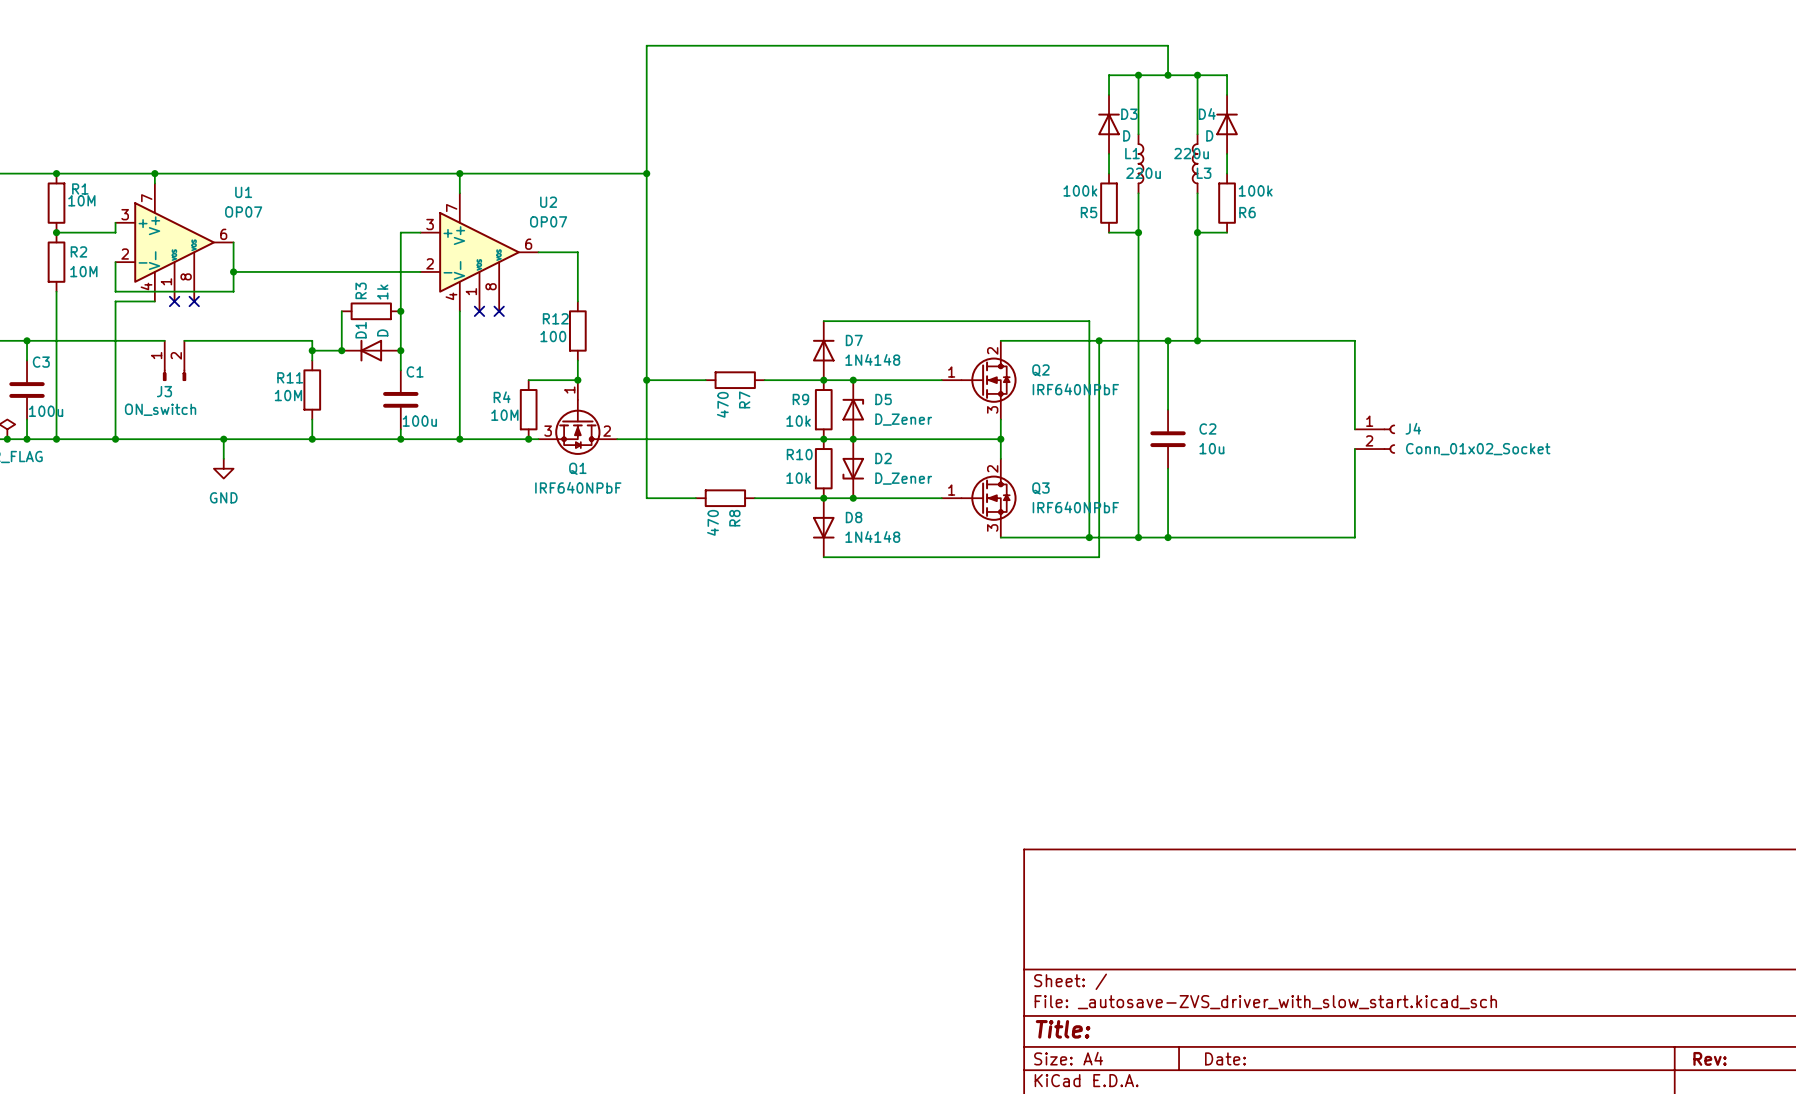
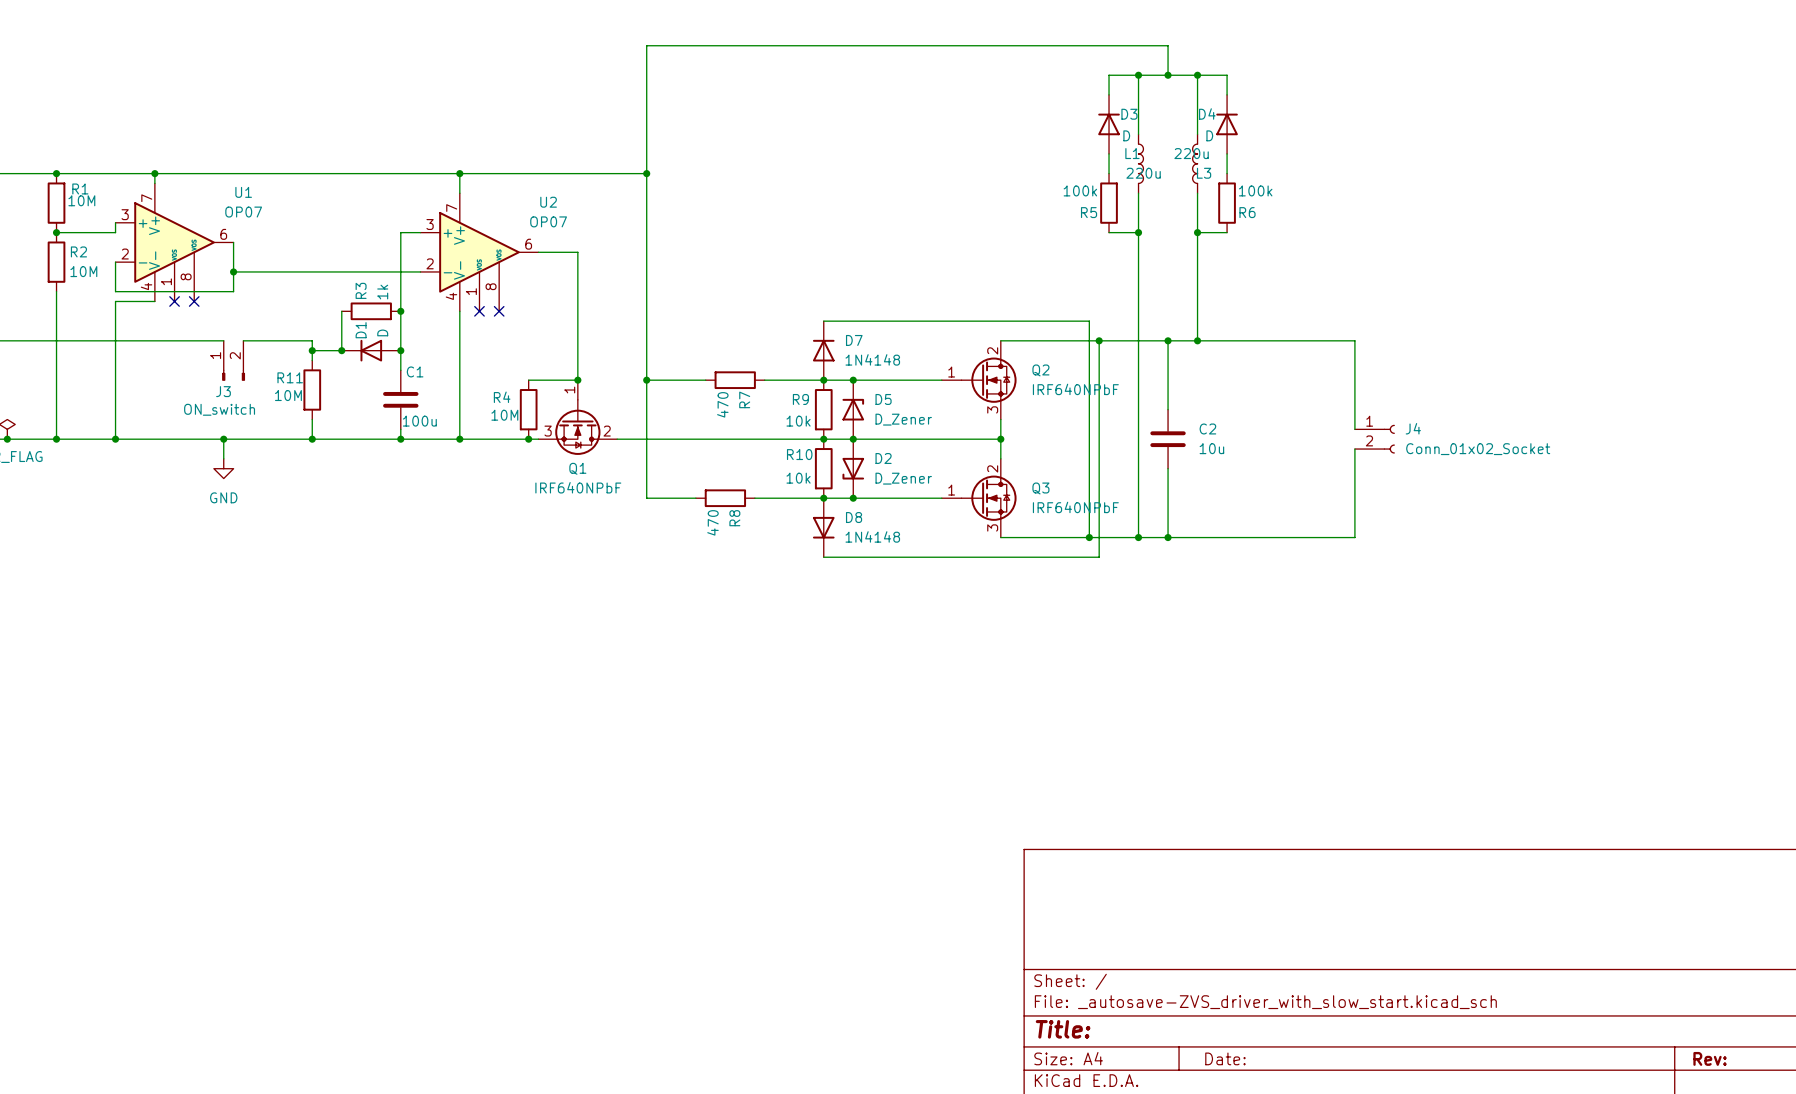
wire: none -> (577, 301) (577, 360)
R12: 100 (577, 330) -> none
wire: (27, 340) (27, 360) -> none
junction: (27, 340) -> none
wire: (223, 340) (243, 340) -> (164, 340) (184, 340)
J3 position: (174, 360) -> (233, 360)
C3: 100u (27, 390) -> none
wire: (27, 419) (27, 439) -> none
junction: (27, 439) -> none

